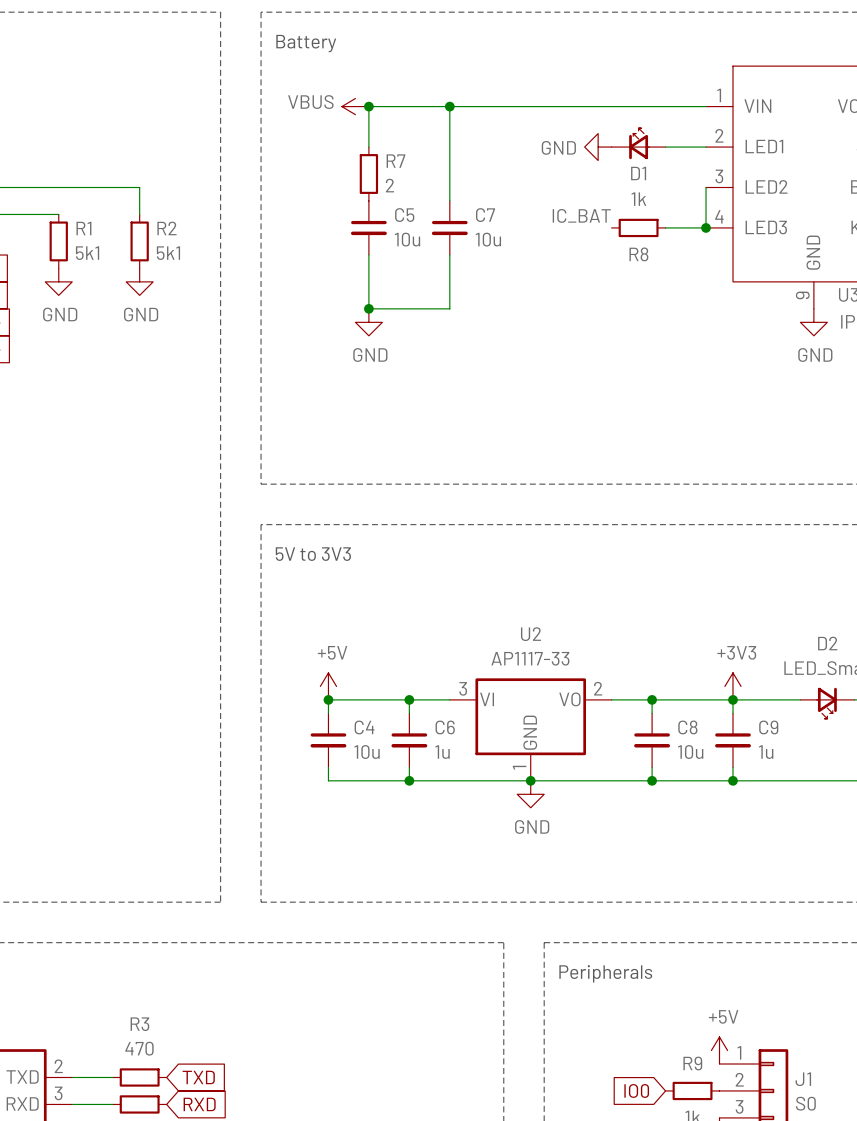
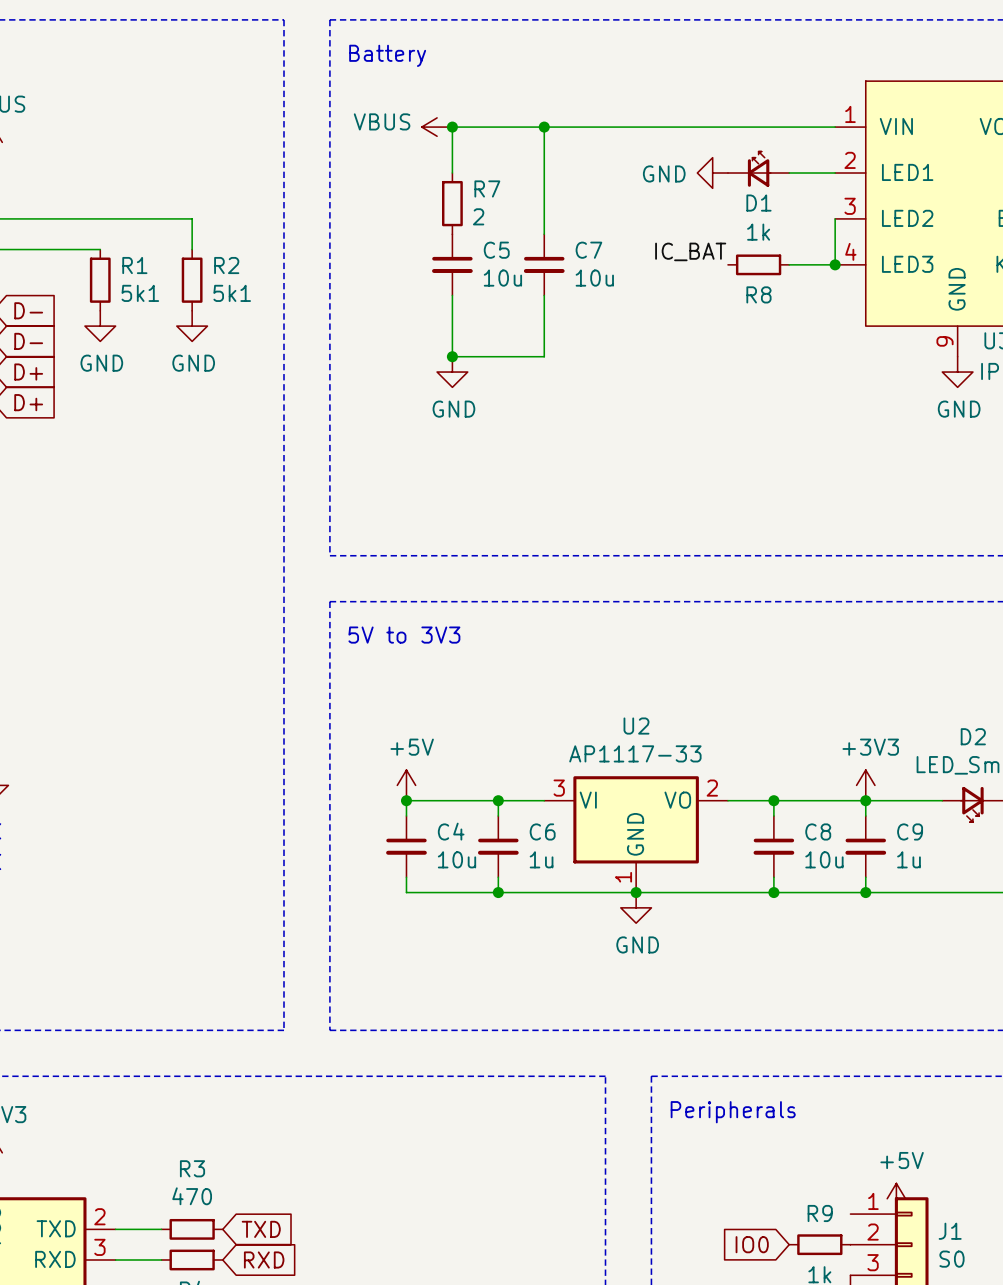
power symbol position: +5V (719, 1050) -> +5V (896, 1198)

